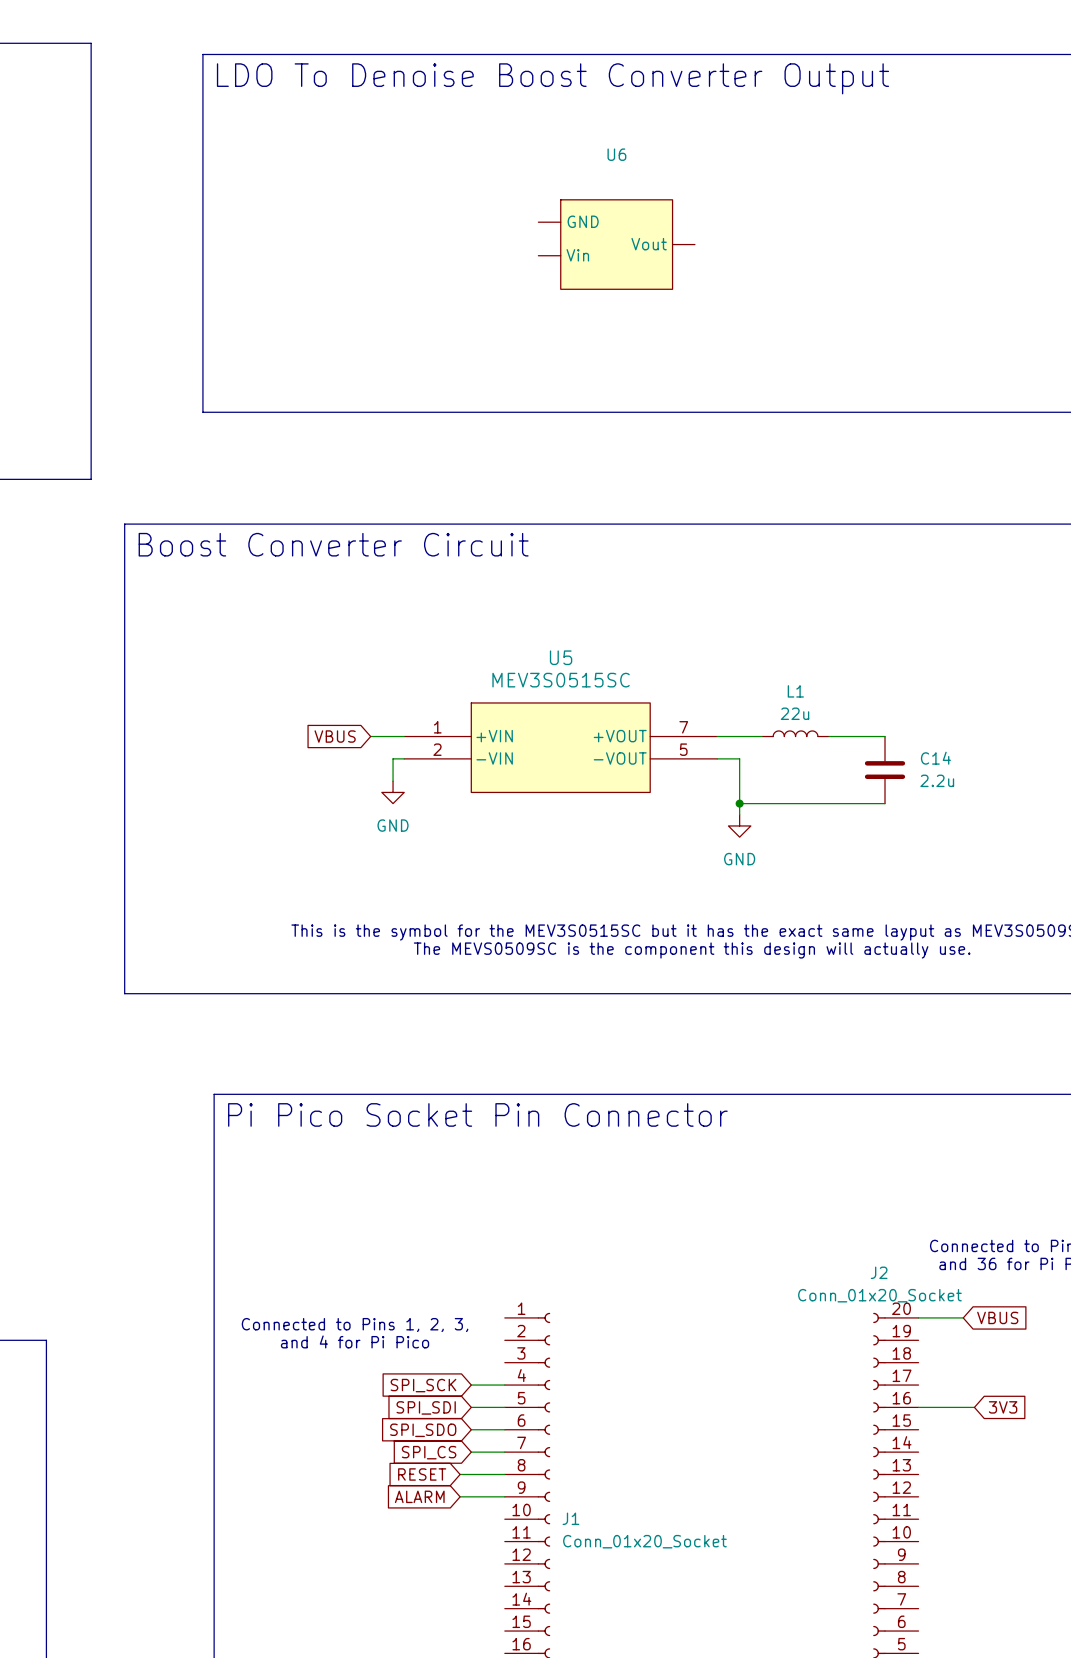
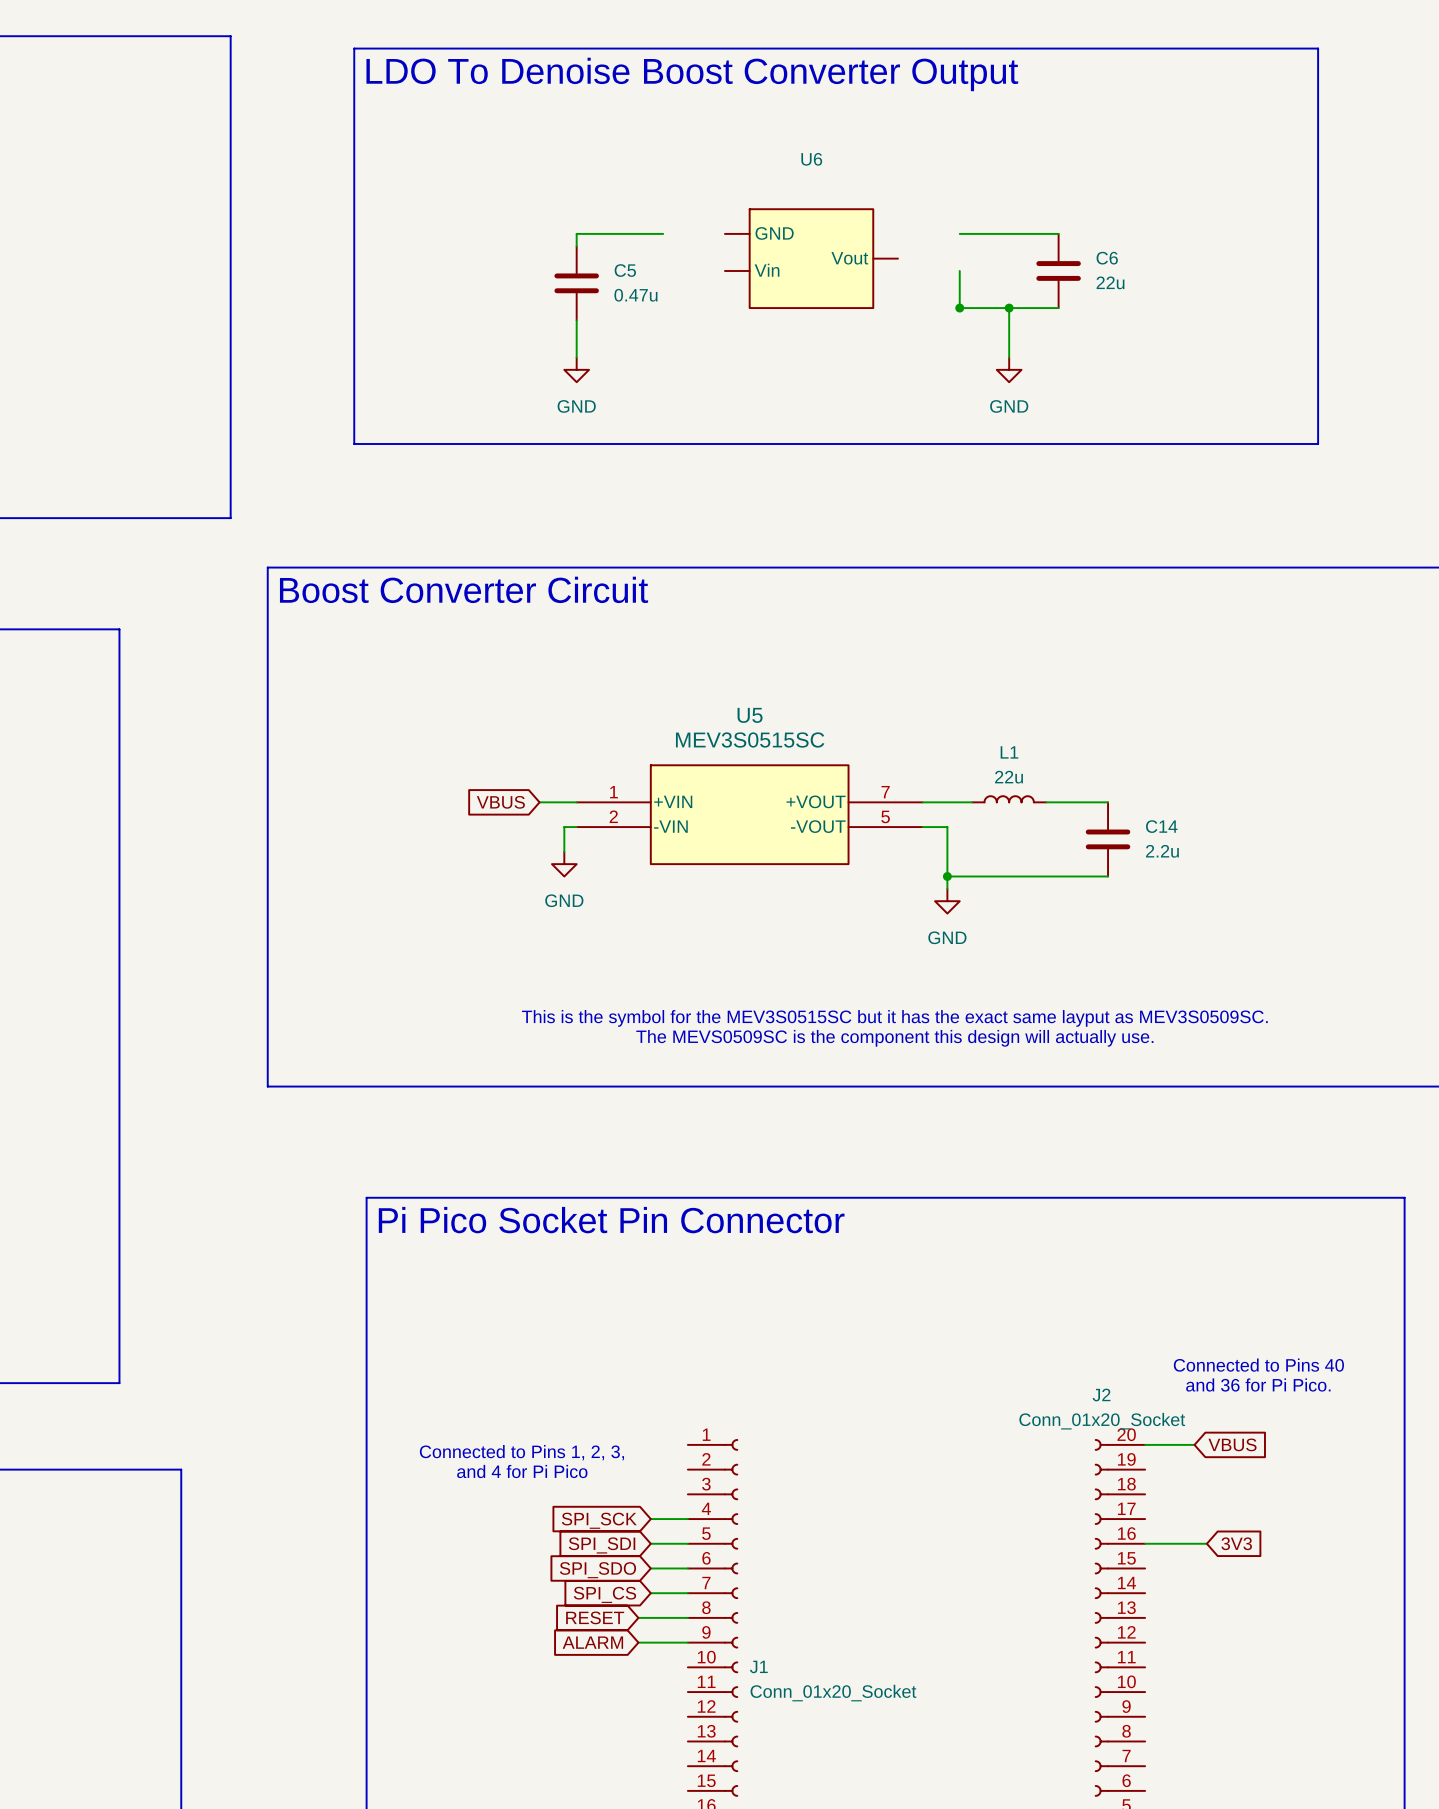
wire: none -> (663, 233) (576, 233) (576, 246)
wire: none -> (959, 233) (1058, 233)
wire: none -> (959, 270) (959, 308) (1058, 308)
C6: none -> 22u (1058, 270)
C5: none -> 0.47u (576, 283)
junction: none -> (959, 308)
wire: none -> (1009, 308) (1009, 357)
junction: none -> (1009, 308)
wire: none -> (576, 320) (576, 357)
power symbol: none -> GND (576, 369)
power symbol: none -> GND (1009, 369)

